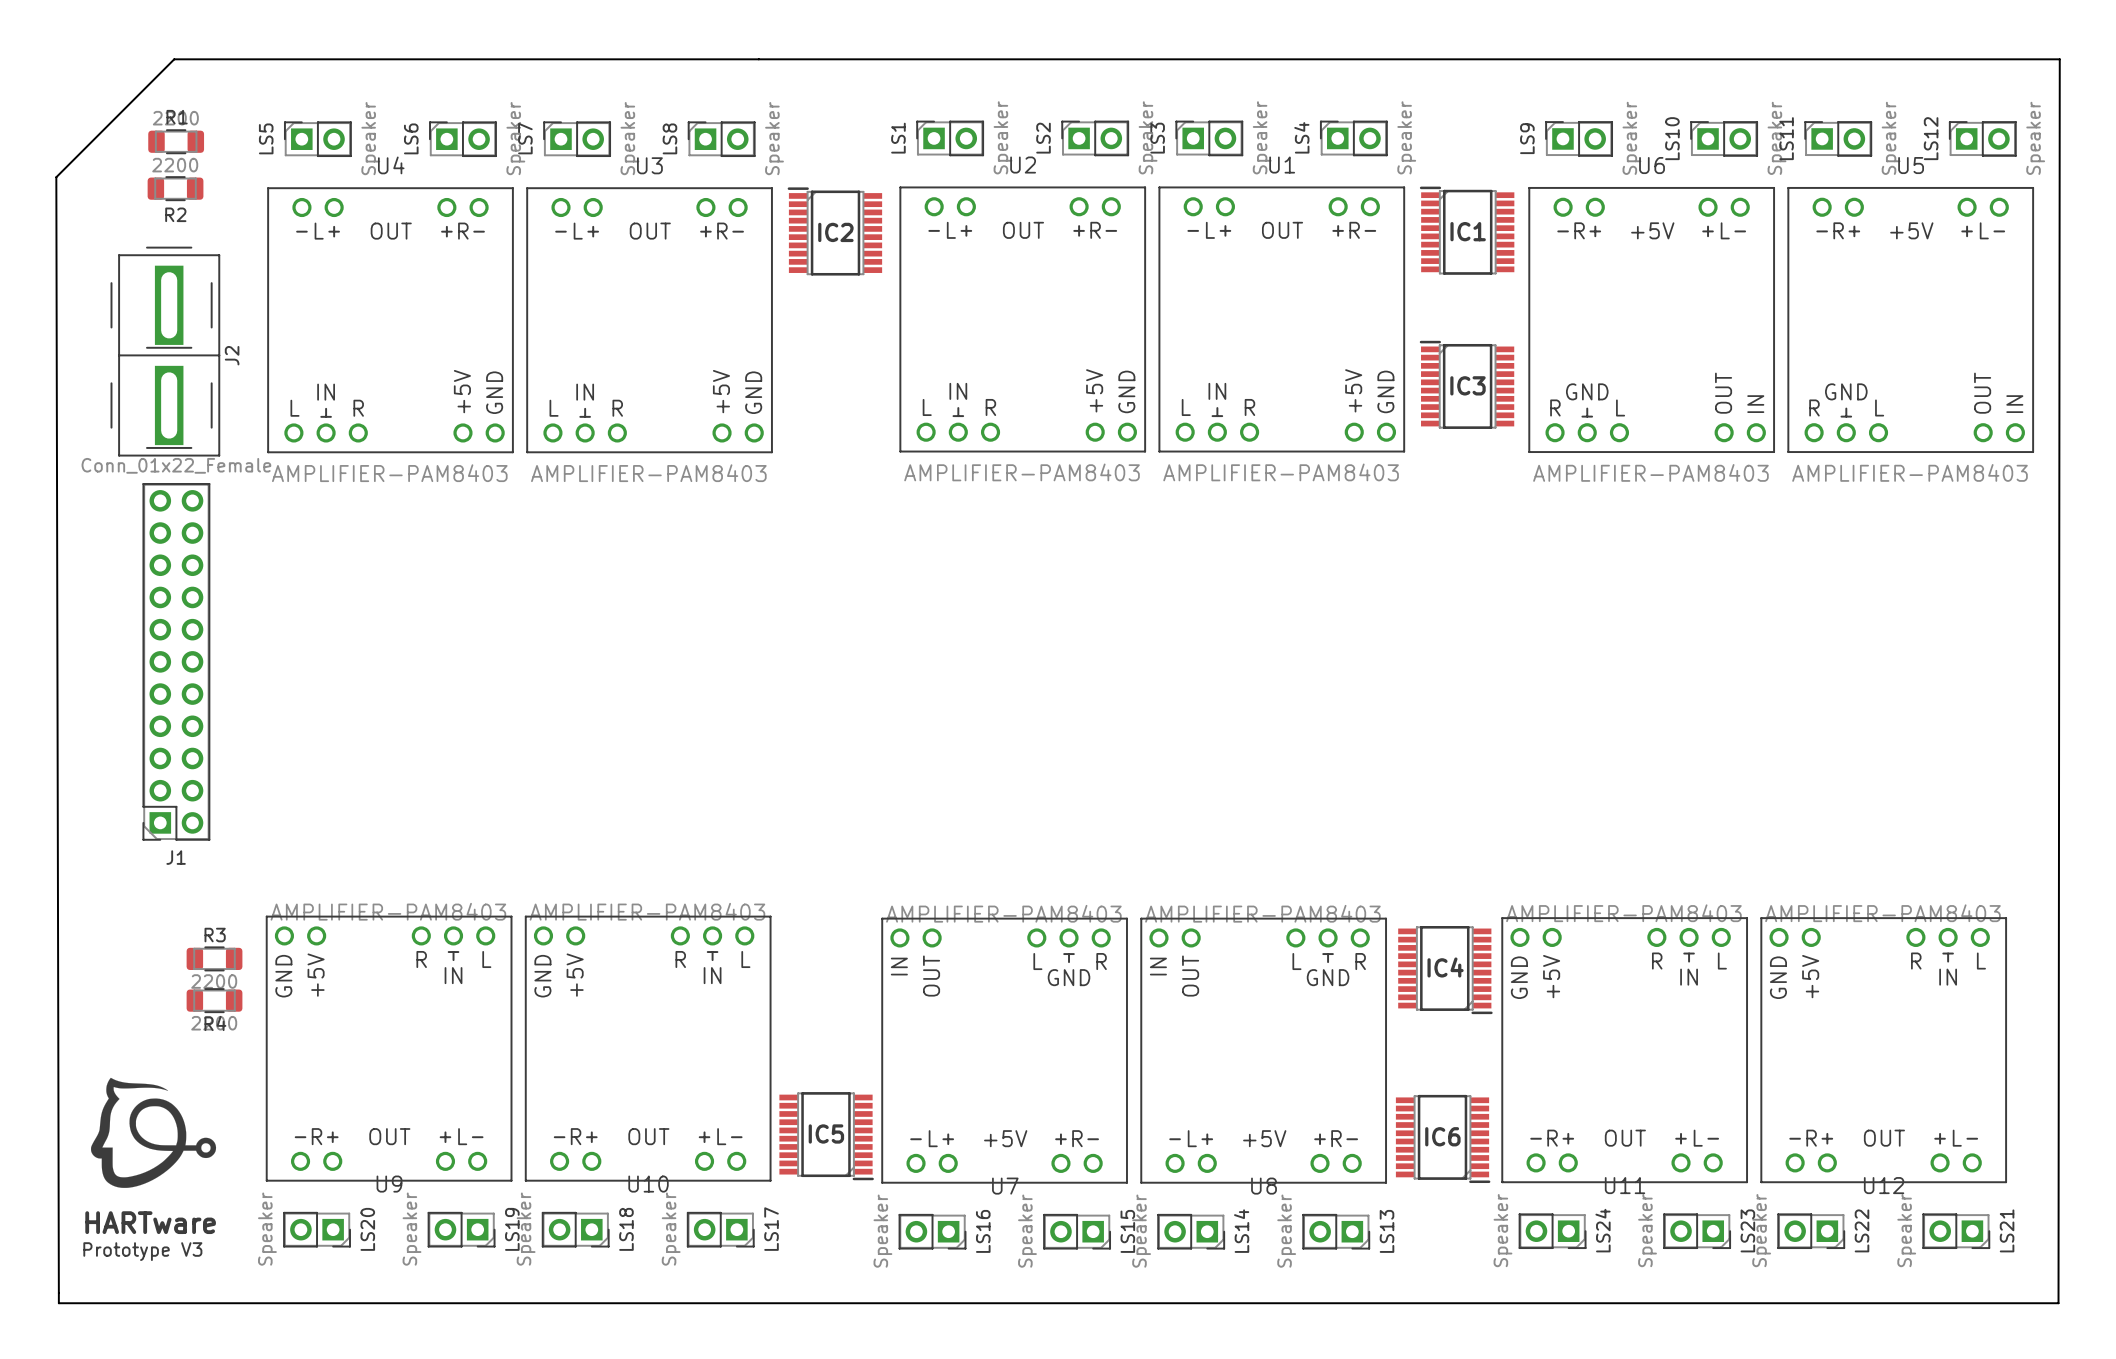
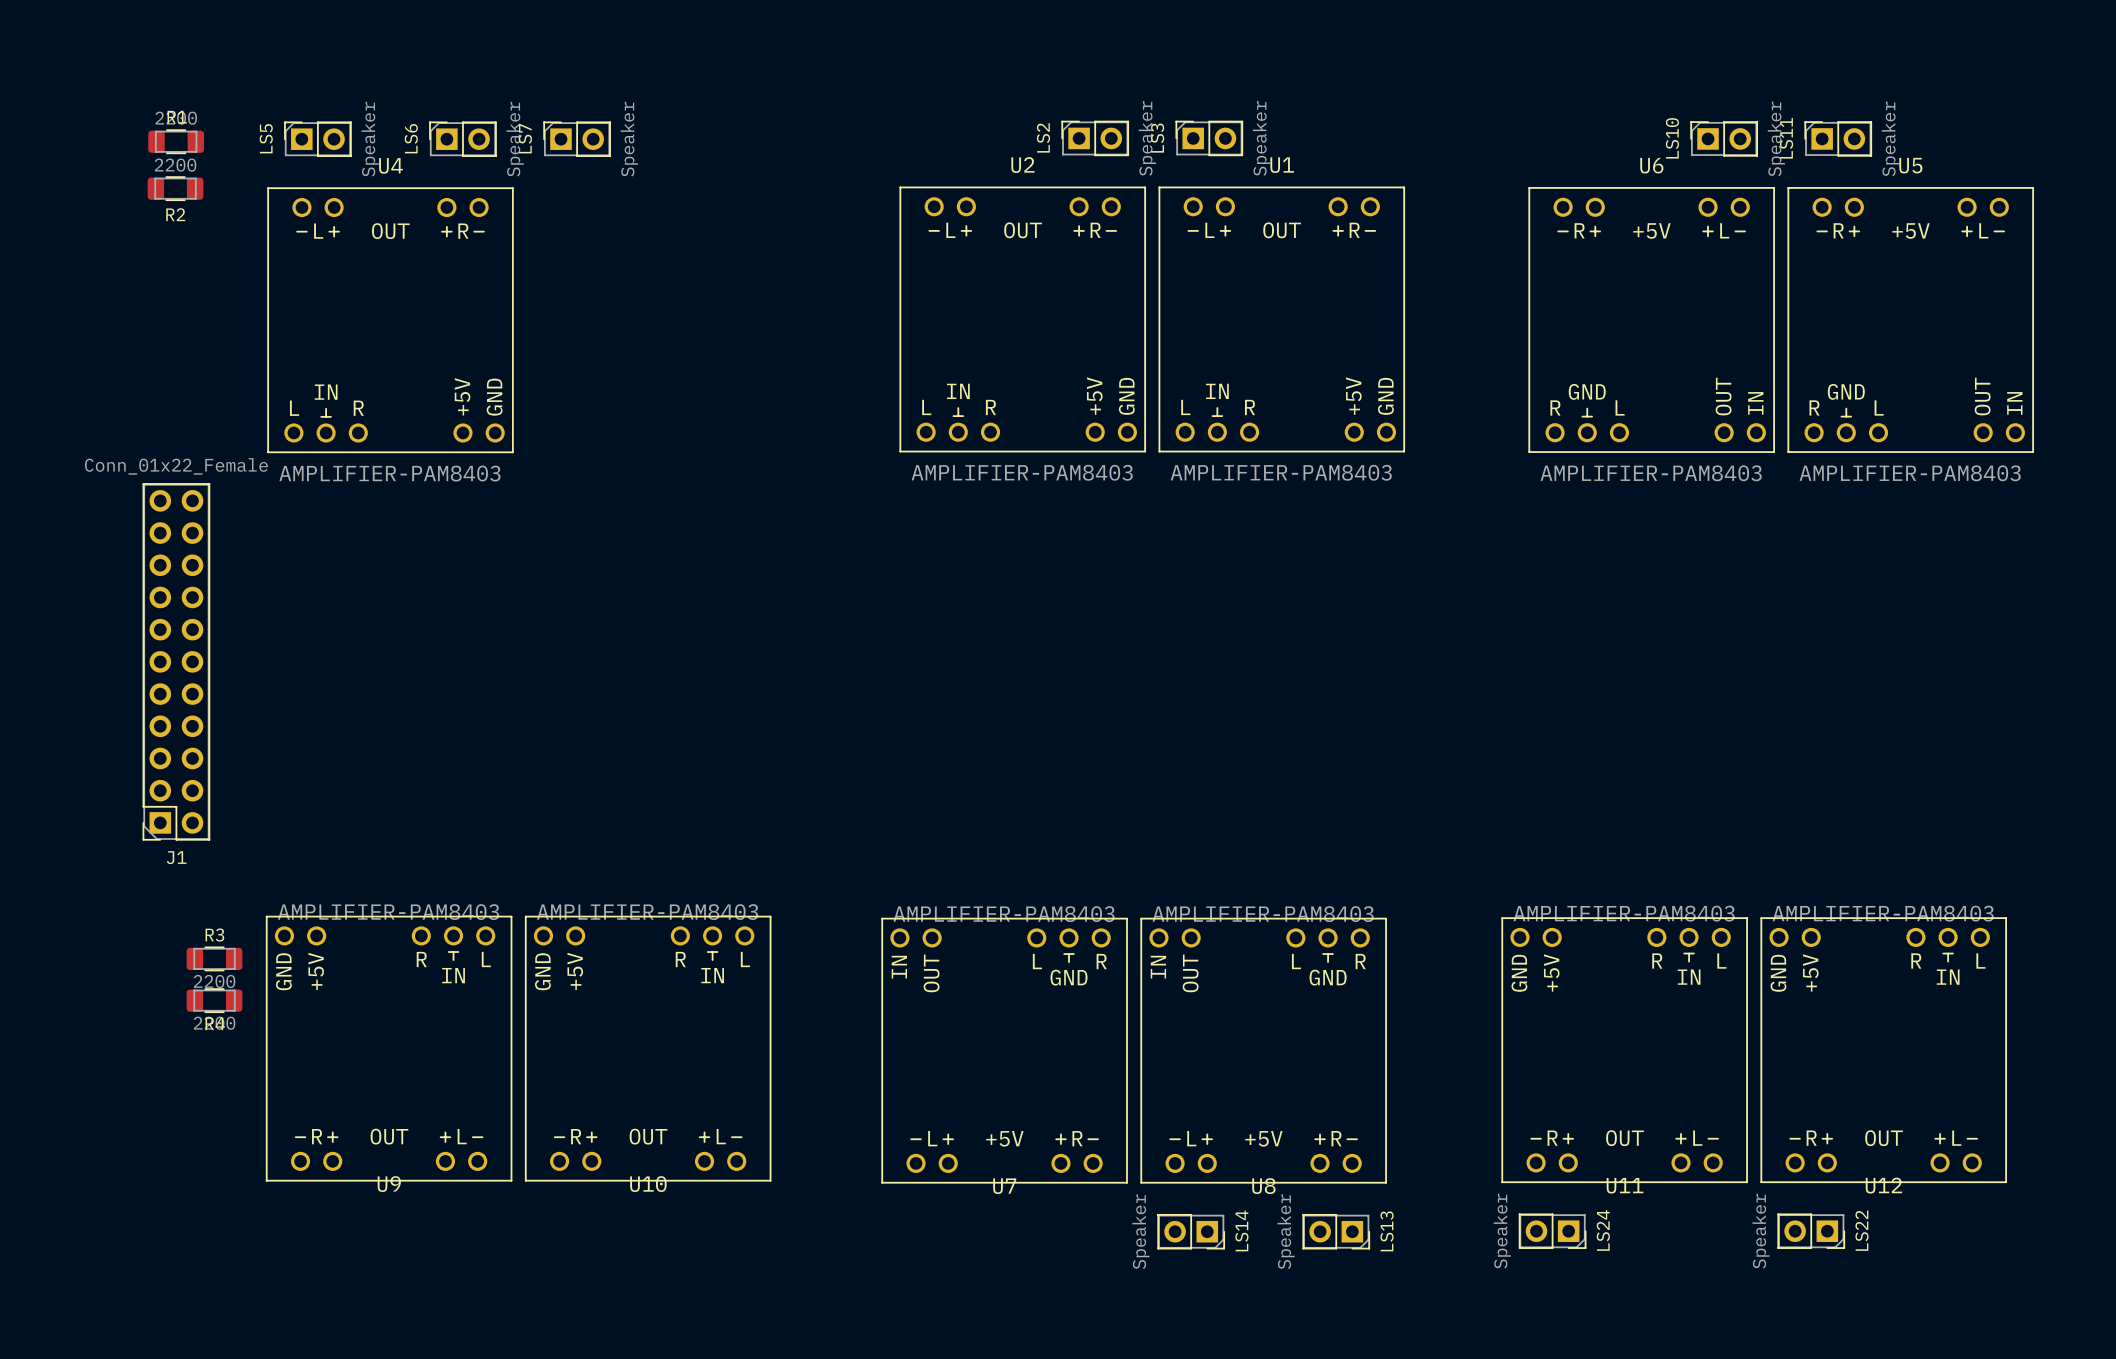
board edge: (174, 59) (56, 177) (58, 1303) (2058, 1303) (2059, 59) (174, 59) -> none
LS1: Speaker (950, 138) -> none
LS4: Speaker (1353, 138) -> none
LS9: Speaker (1579, 138) -> none
LS12: Speaker (1982, 138) -> none
LS8: Speaker (721, 139) -> none
IC1: (1467, 230) -> none
IC2: (834, 231) -> none
U3: AMPLIFIER-PAM8403 (649, 320) -> none
J2: (165, 351) -> none
IC3: (1466, 384) -> none
IC4: (1445, 970) -> none
drawing: [90, 1077, 217, 1188] -> none
IC5: (826, 1136) -> none
IC6: (1443, 1138) -> none
text: HARTware (150, 1222) -> none
LS20: Speaker (317, 1229) -> none
LS19: Speaker (461, 1229) -> none
LS18: Speaker (575, 1229) -> none
LS17: Speaker (720, 1229) -> none
LS16: Speaker (932, 1231) -> none
LS15: Speaker (1077, 1231) -> none
LS23: Speaker (1697, 1231) -> none
LS21: Speaker (1956, 1231) -> none
text: Prototype V3 (142, 1251) -> none

